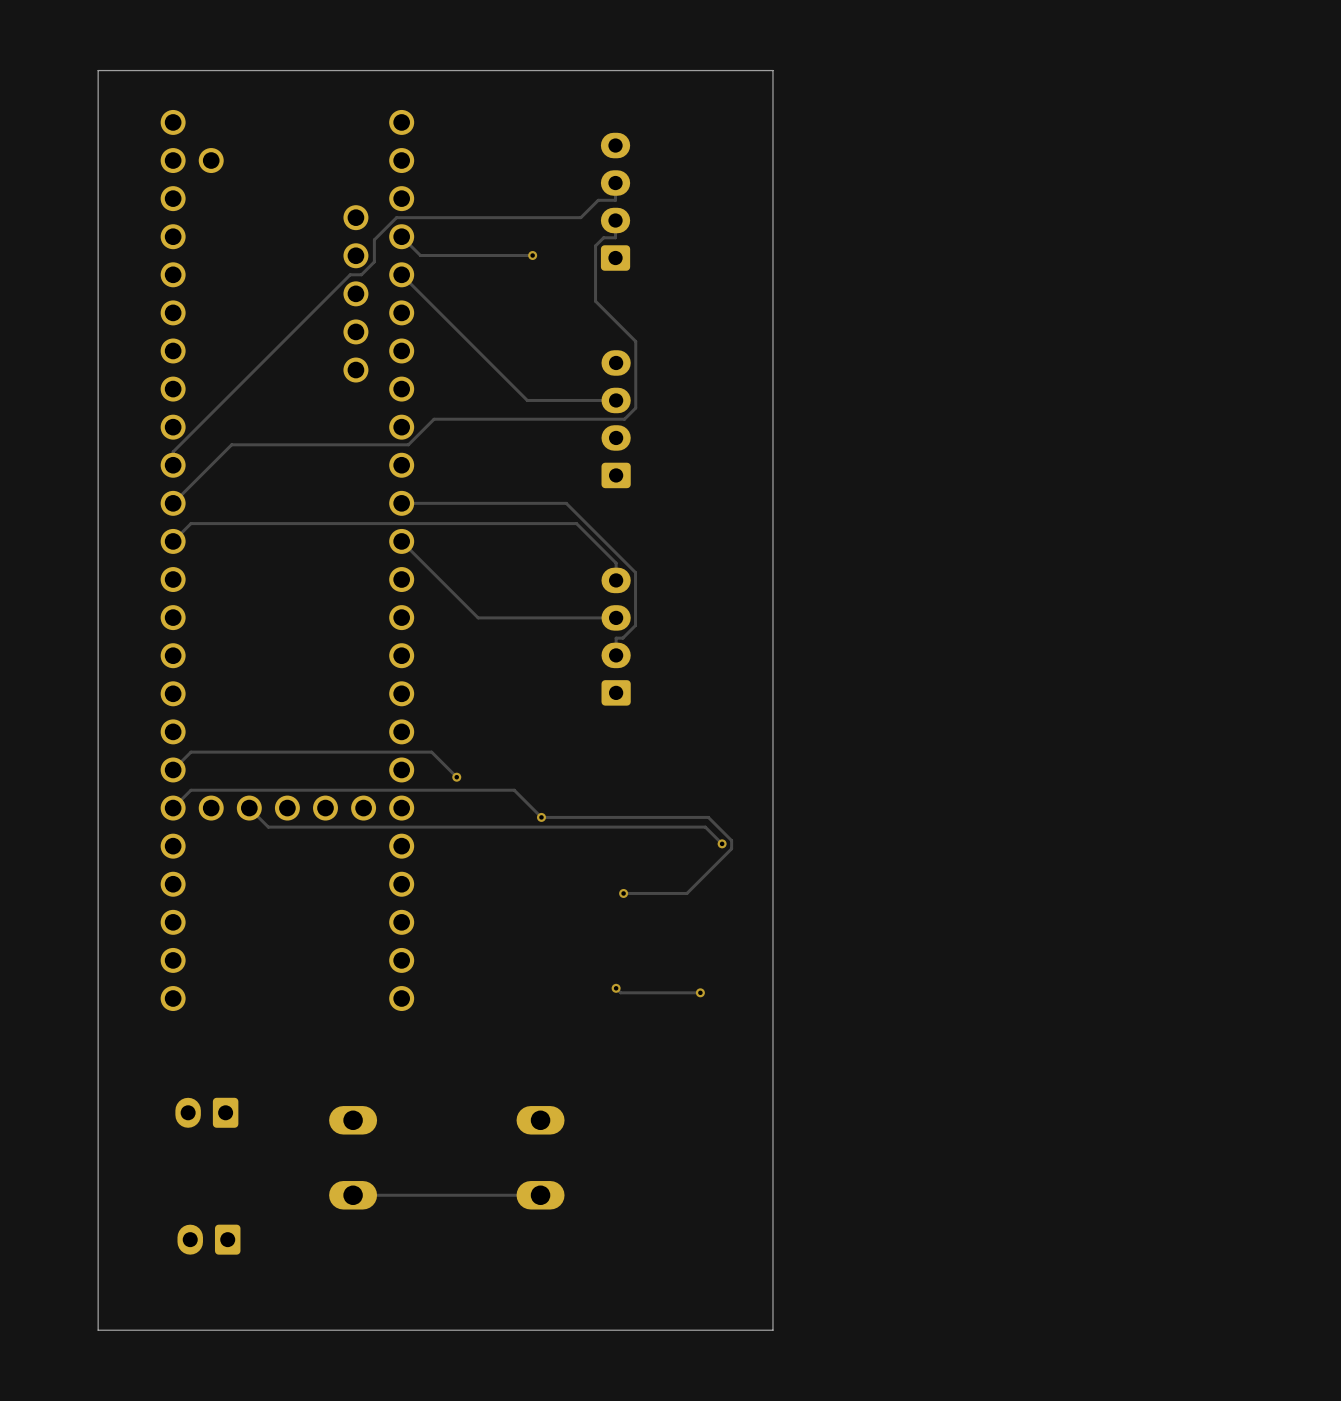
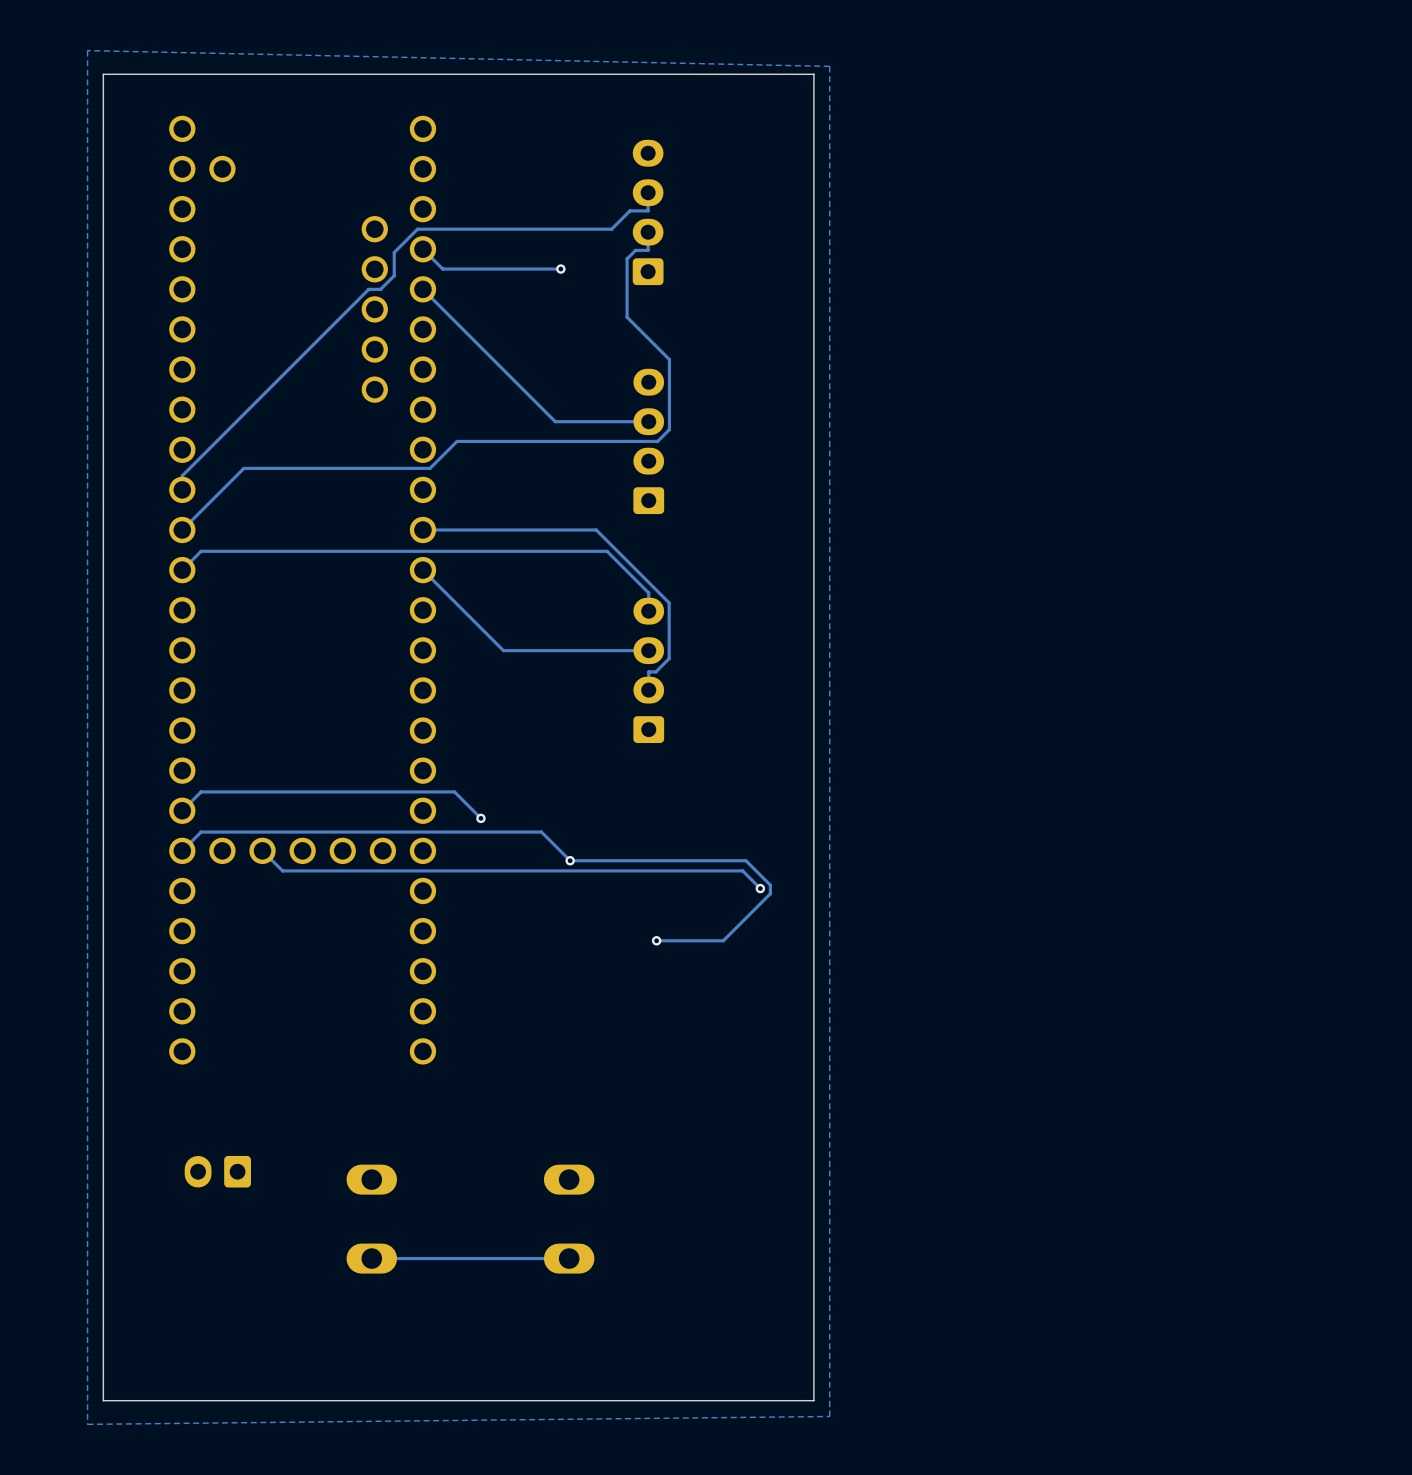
zone outline: none -> (87, 50) (829, 66) (829, 1416) (87, 1424) (87, 50)
track: (616, 988) (620, 992) (700, 992) -> none
via: (616, 988) -> none
via: (700, 992) -> none
part: (208, 1239) -> none

